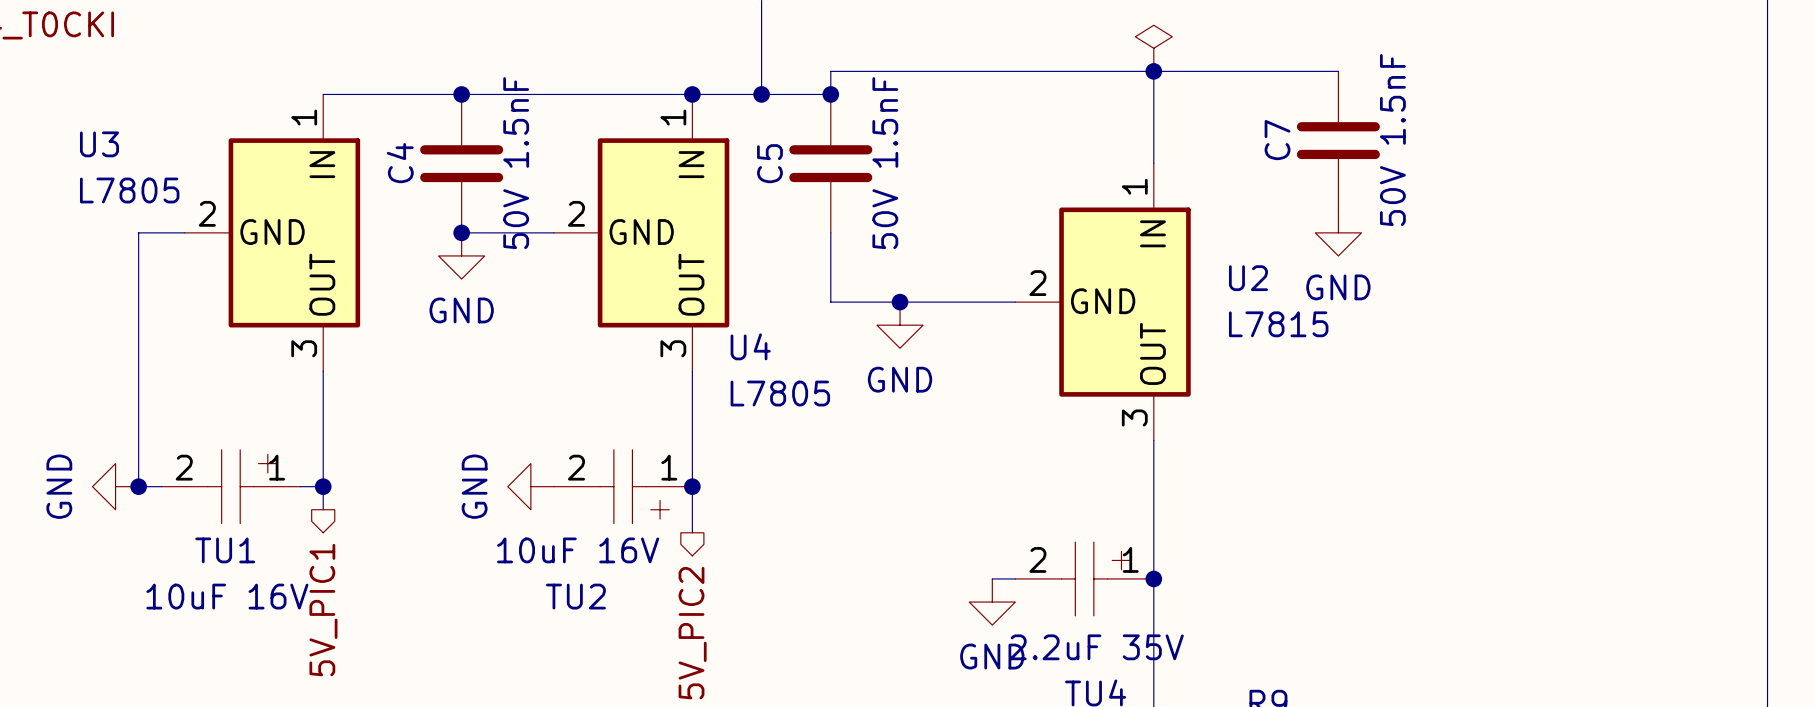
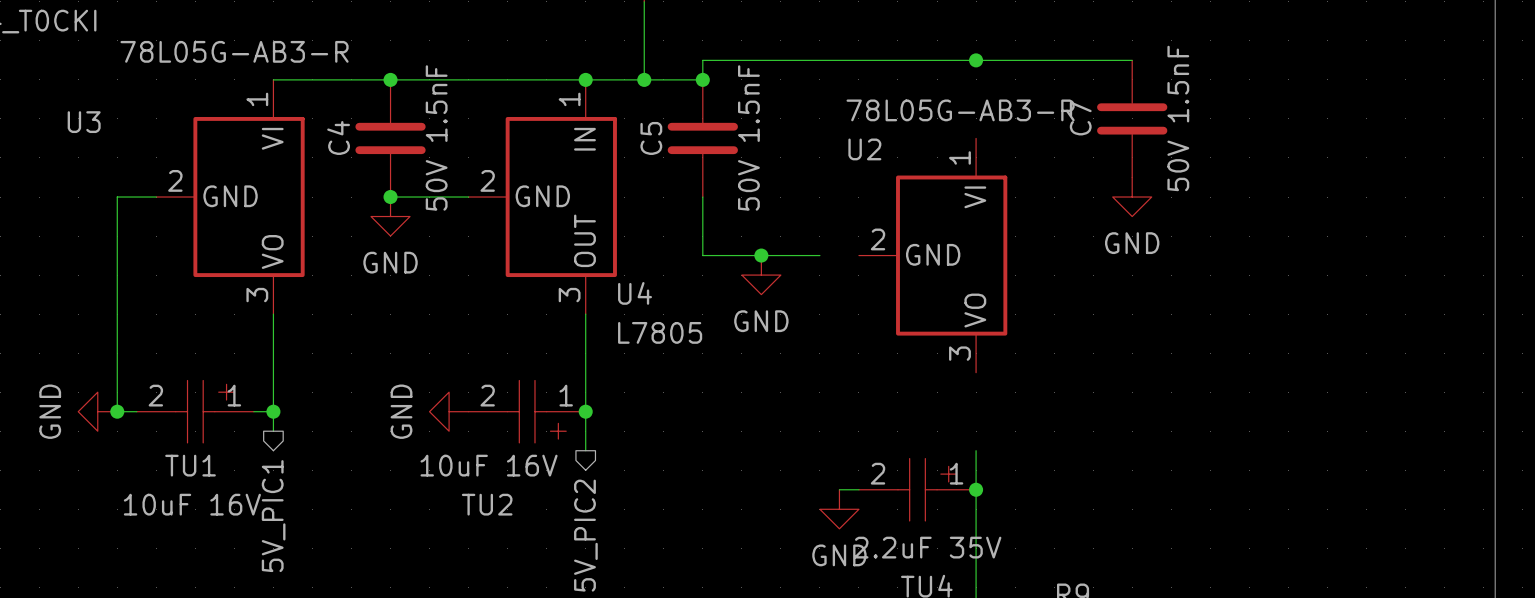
power symbol: (1153, 48) -> none
wire: (1153, 71) (1153, 163) -> none
U3 pin name: IN (322, 164) -> VI (272, 138)
U3 value: L7805 (129, 190) -> 78L05G-AB3-R (234, 51)
U2 pin name: IN (1152, 233) -> VI (975, 197)
U2 name position: U2 (1248, 278) -> U2 (864, 149)
U3 pin name: OUT (322, 284) -> VO (272, 251)
wire: (969, 302) (1015, 302) -> none
U2 value: L7815 (1278, 324) -> 78L05G-AB3-R (960, 110)
U2 pin name: OUT (1152, 353) -> VO (975, 310)
wire: (1153, 440) (1153, 532) -> none

